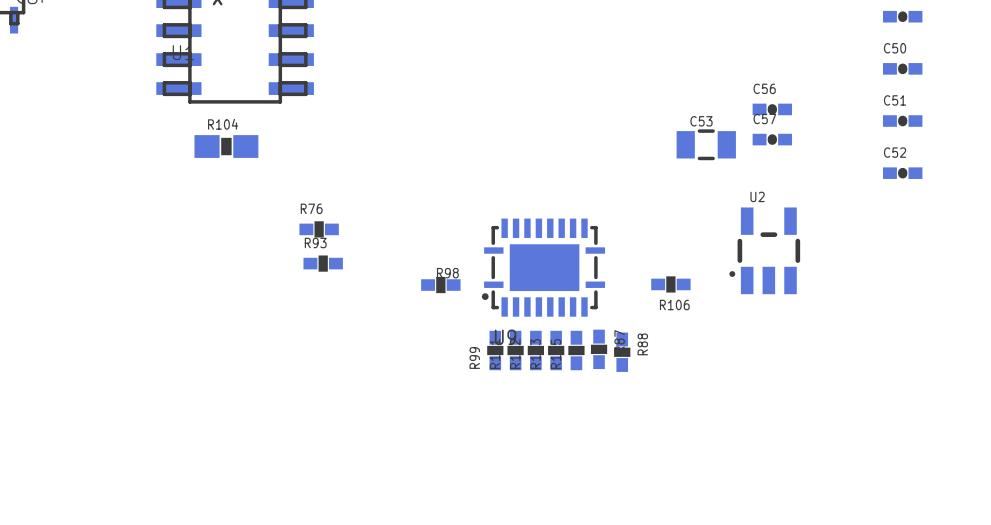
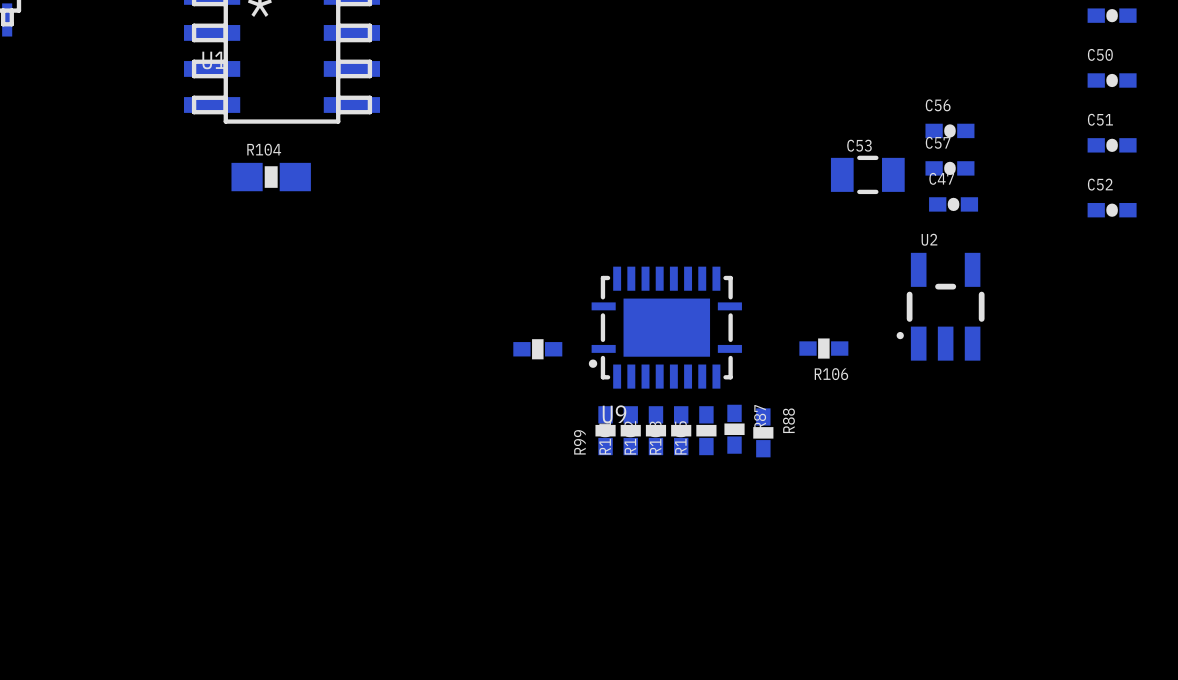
C47: none -> (953, 204)
R76: (319, 229) -> none
R93: (323, 263) -> none
R98 name: R98 (447, 273) -> none

